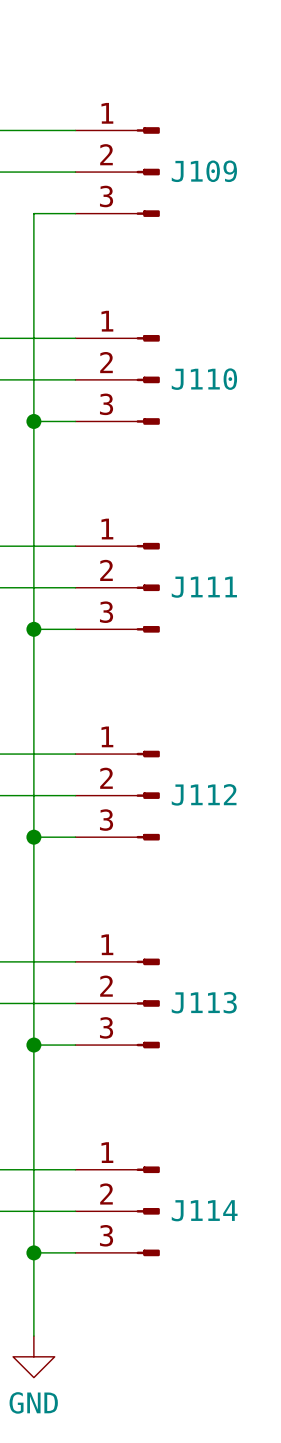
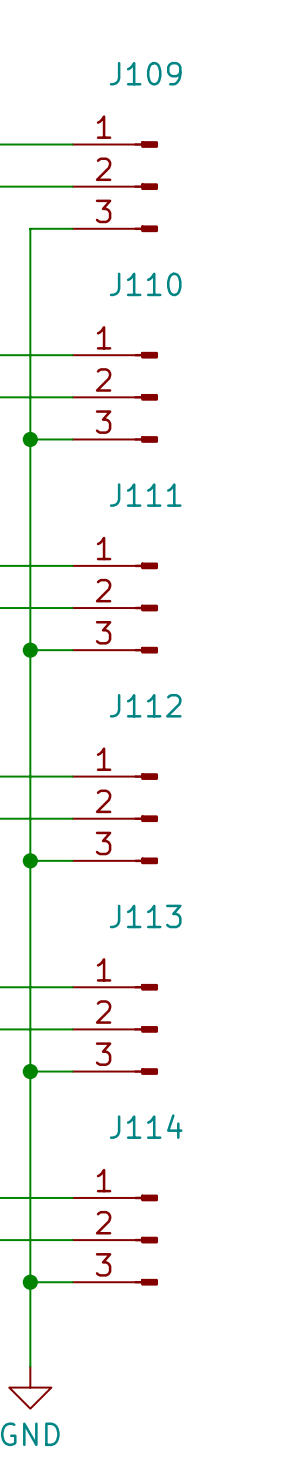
J109 name position: J109 (204, 171) -> J109 (145, 73)
J110 name position: J110 (204, 379) -> J110 (145, 284)
J111 name position: J111 (204, 587) -> J111 (145, 495)
J112 name position: J112 (204, 794) -> J112 (145, 705)
J113 name position: J113 (204, 1002) -> J113 (145, 916)
J114 name position: J114 (204, 1210) -> J114 (146, 1126)

